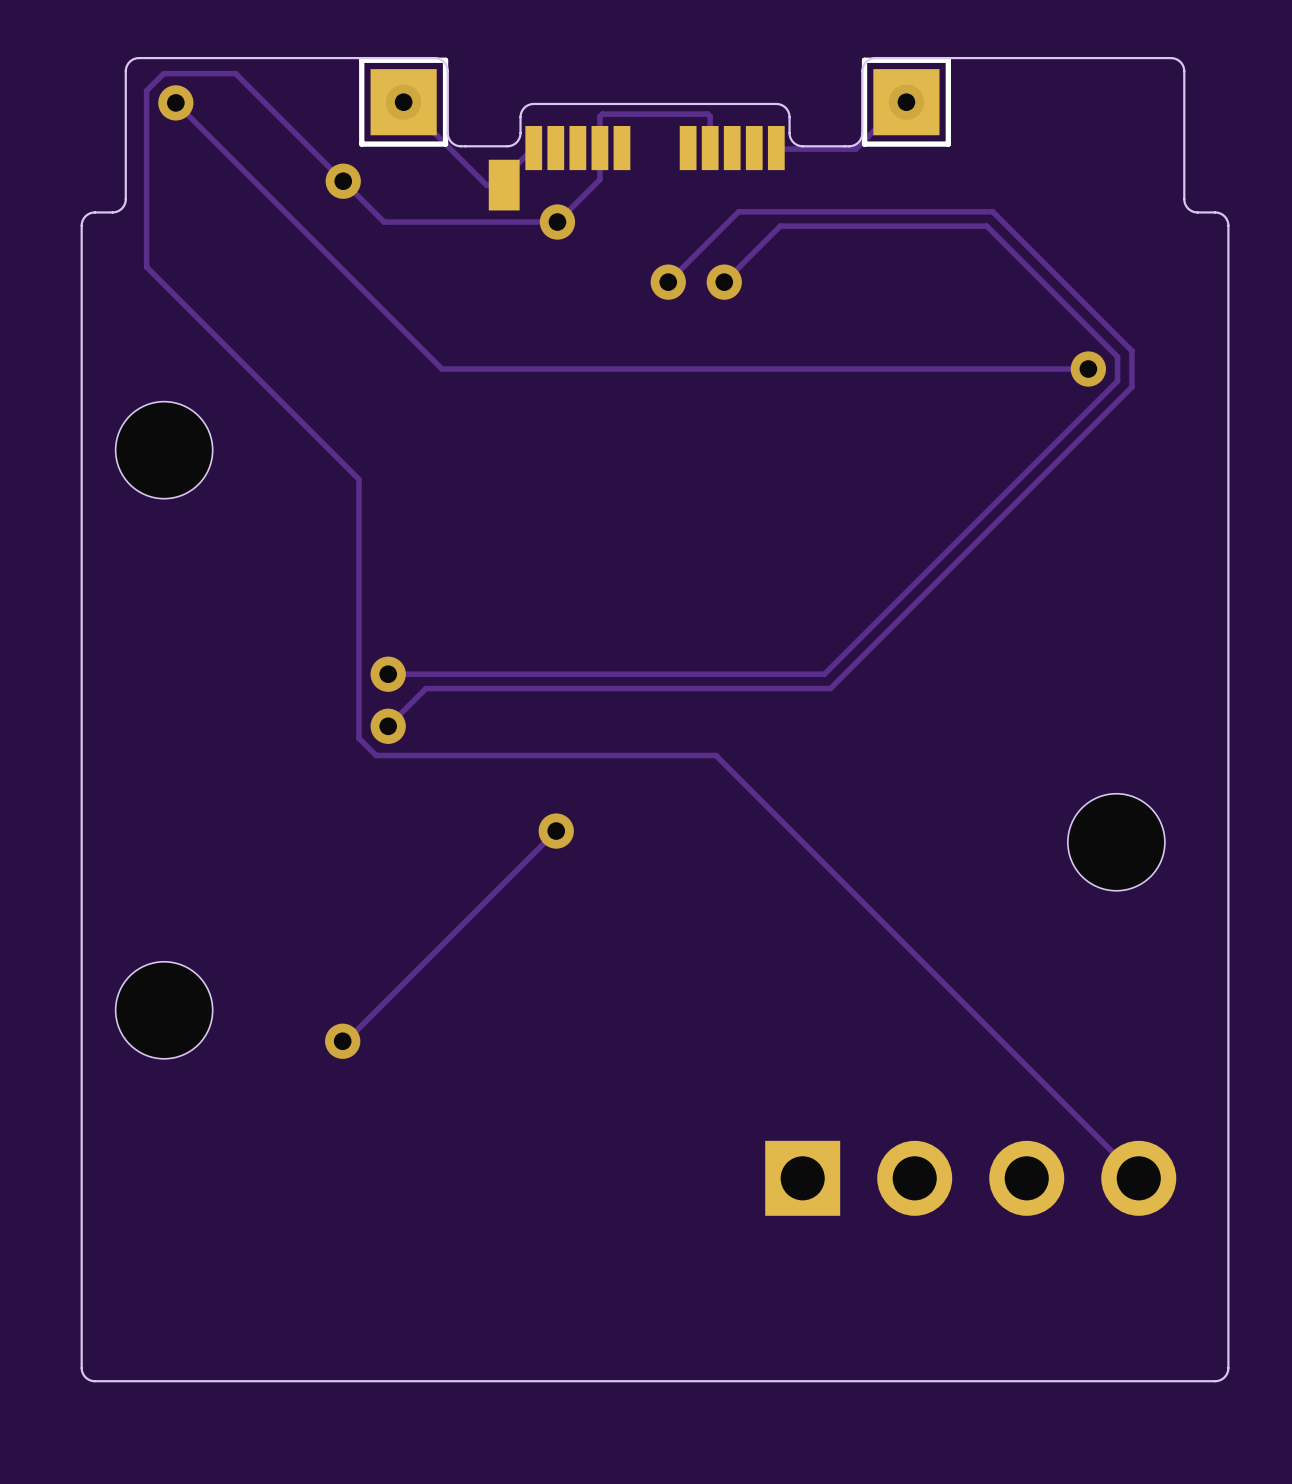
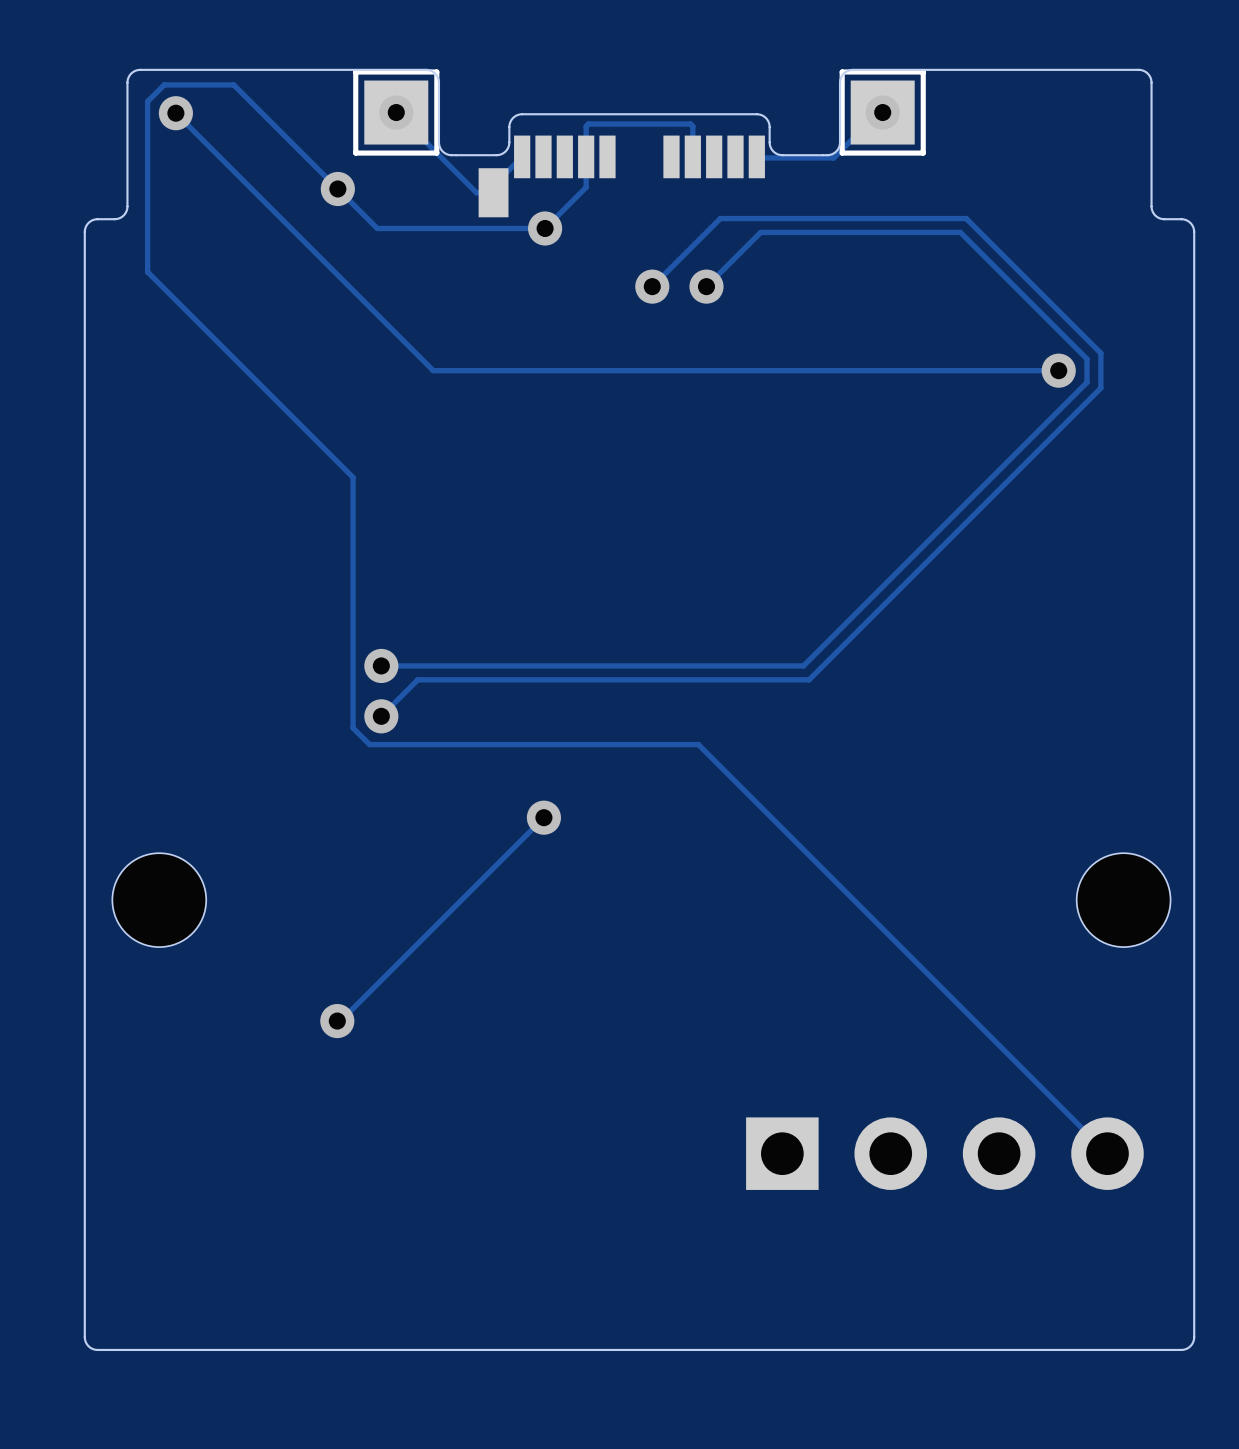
part: (164, 450) -> none
part position: (1116, 842) -> (1123, 900)
part position: (164, 1010) -> (159, 900)

